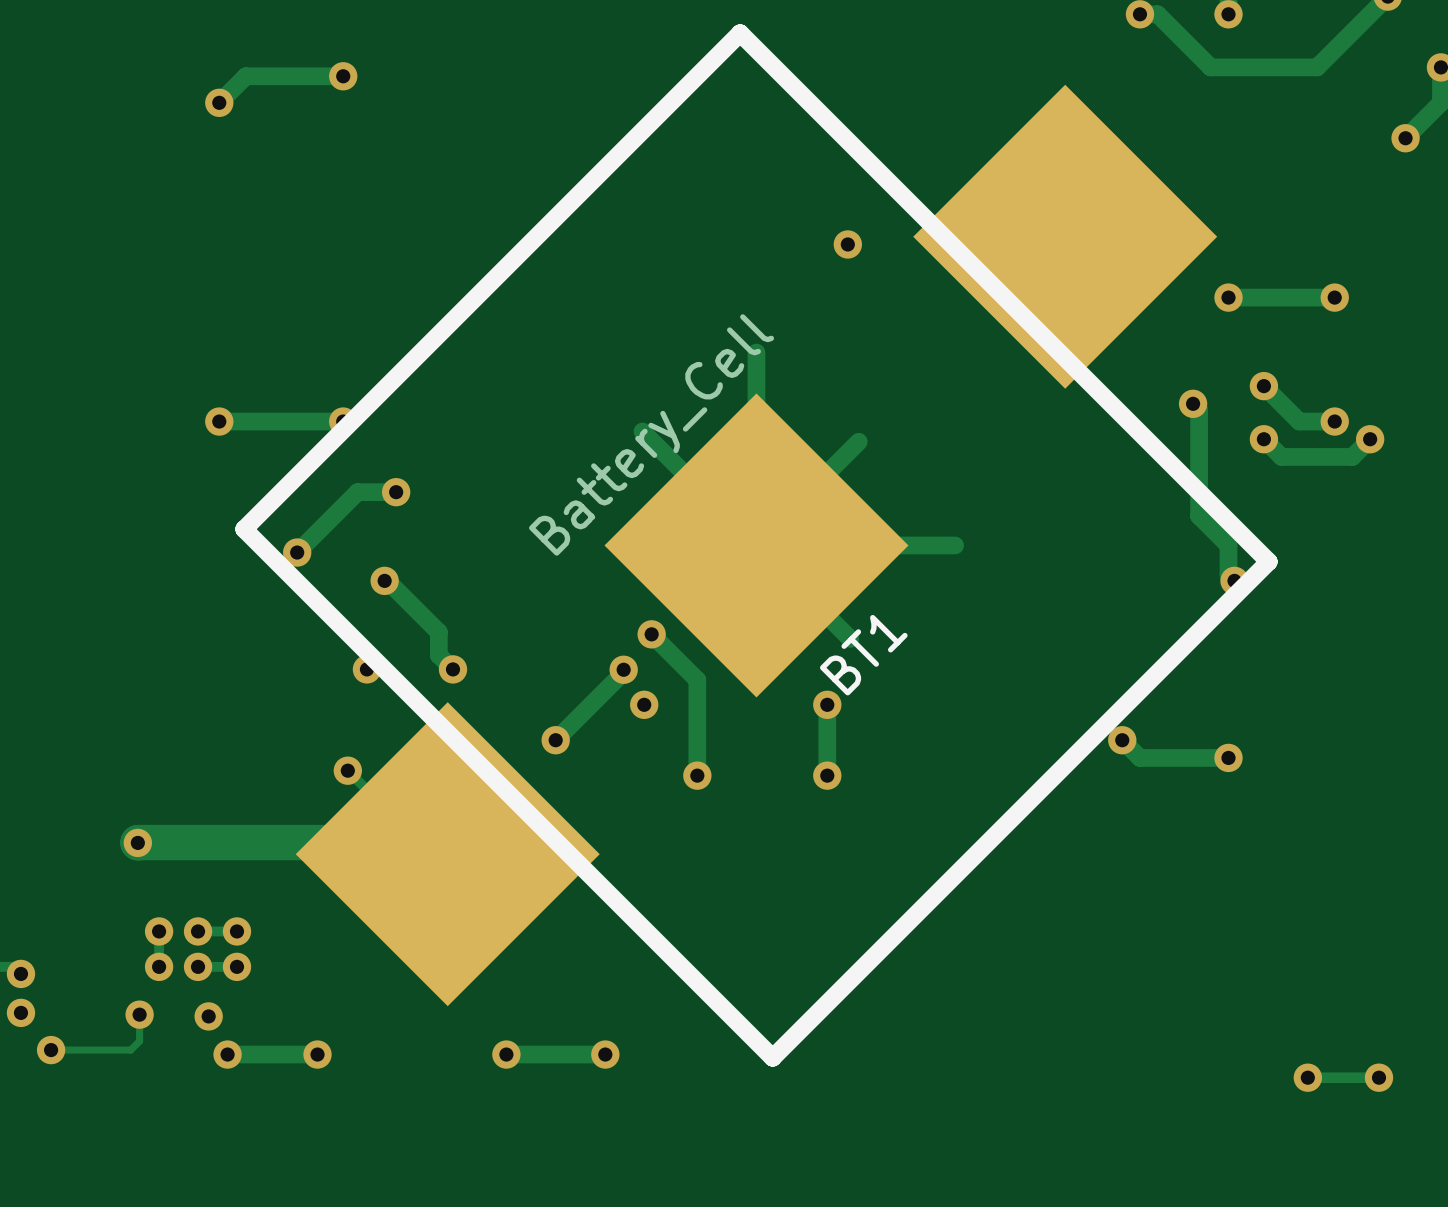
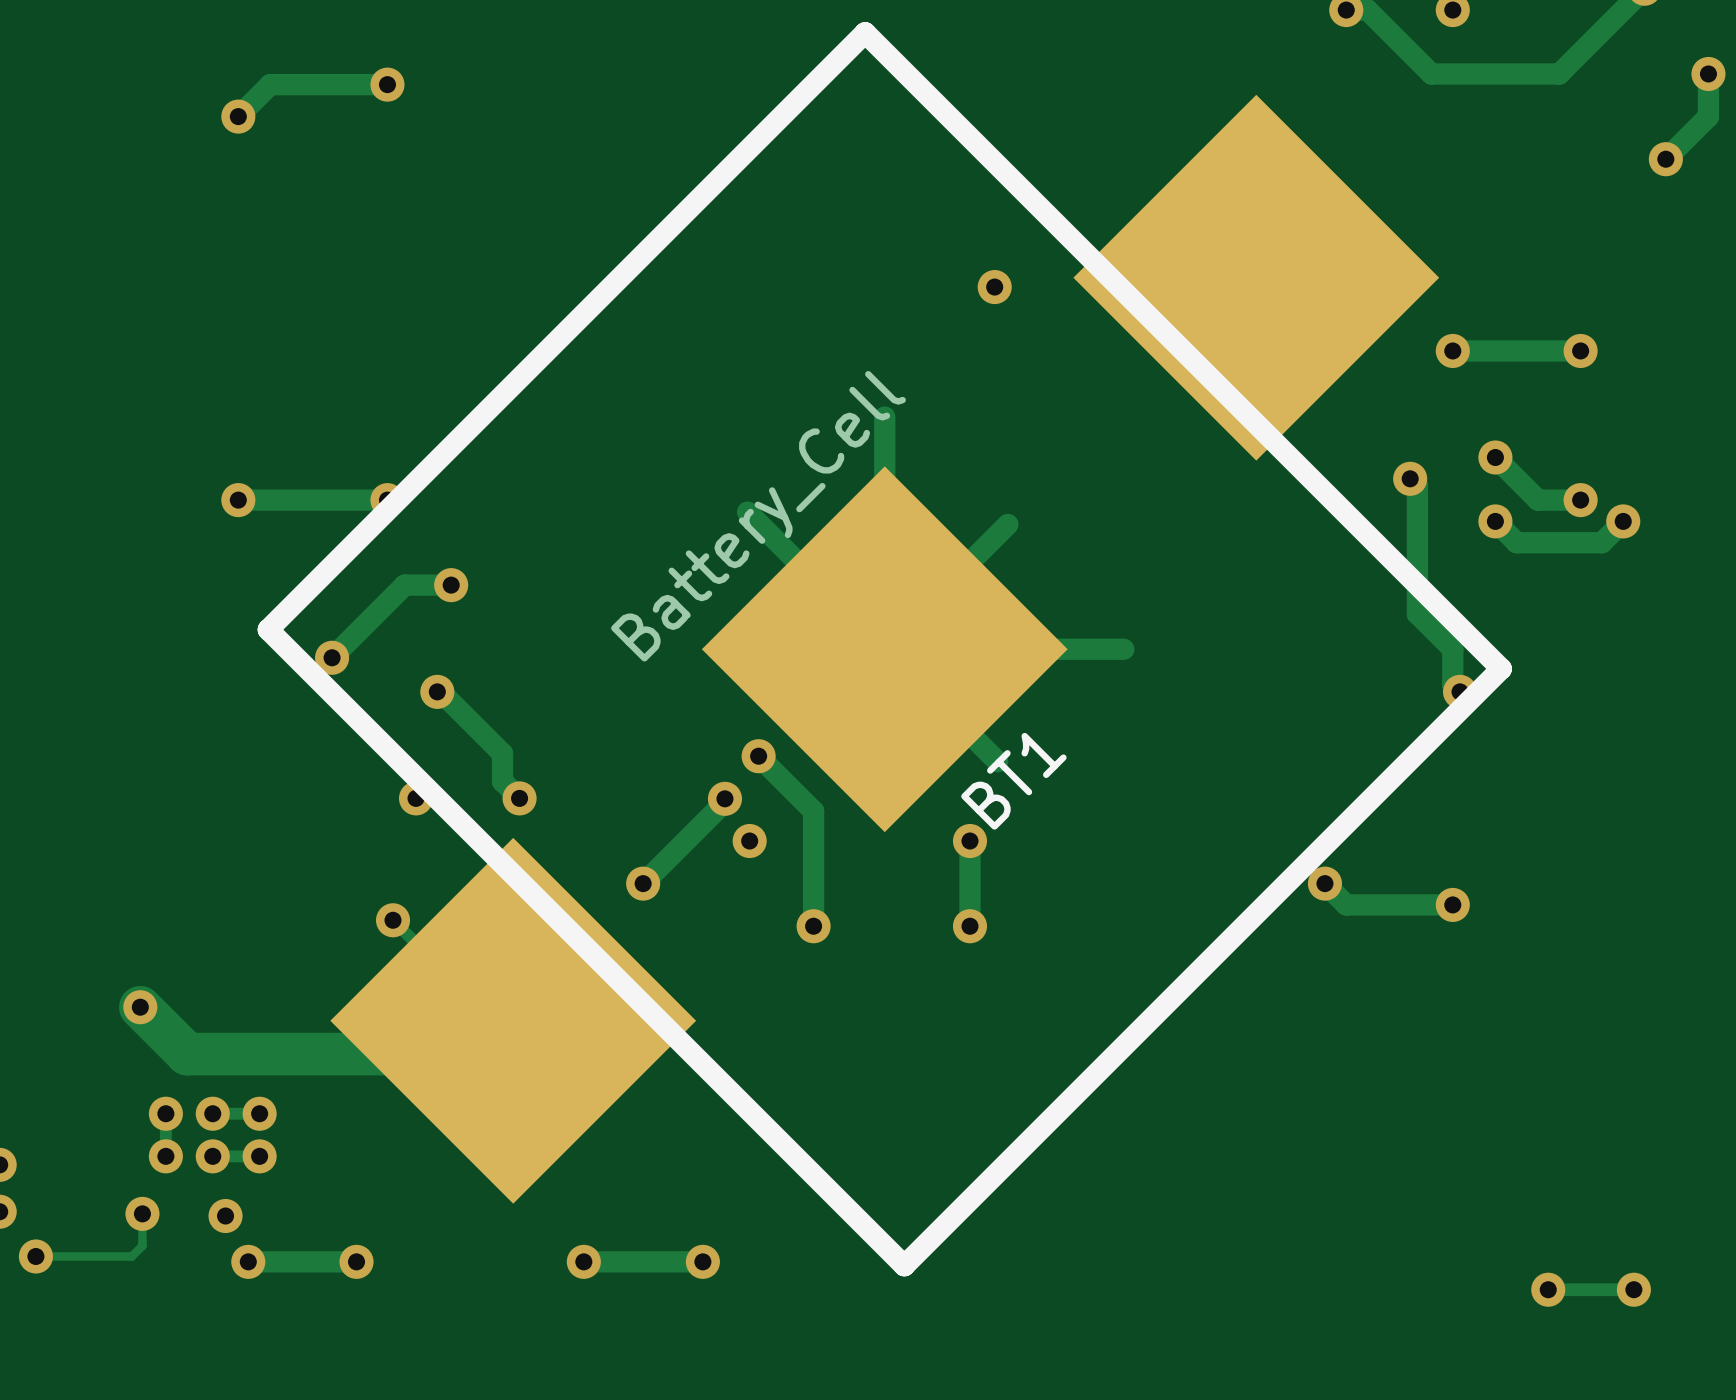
track: (138, 842) (377, 842) (416, 881) -> (140, 1007) (187, 1054) (476, 1054)

